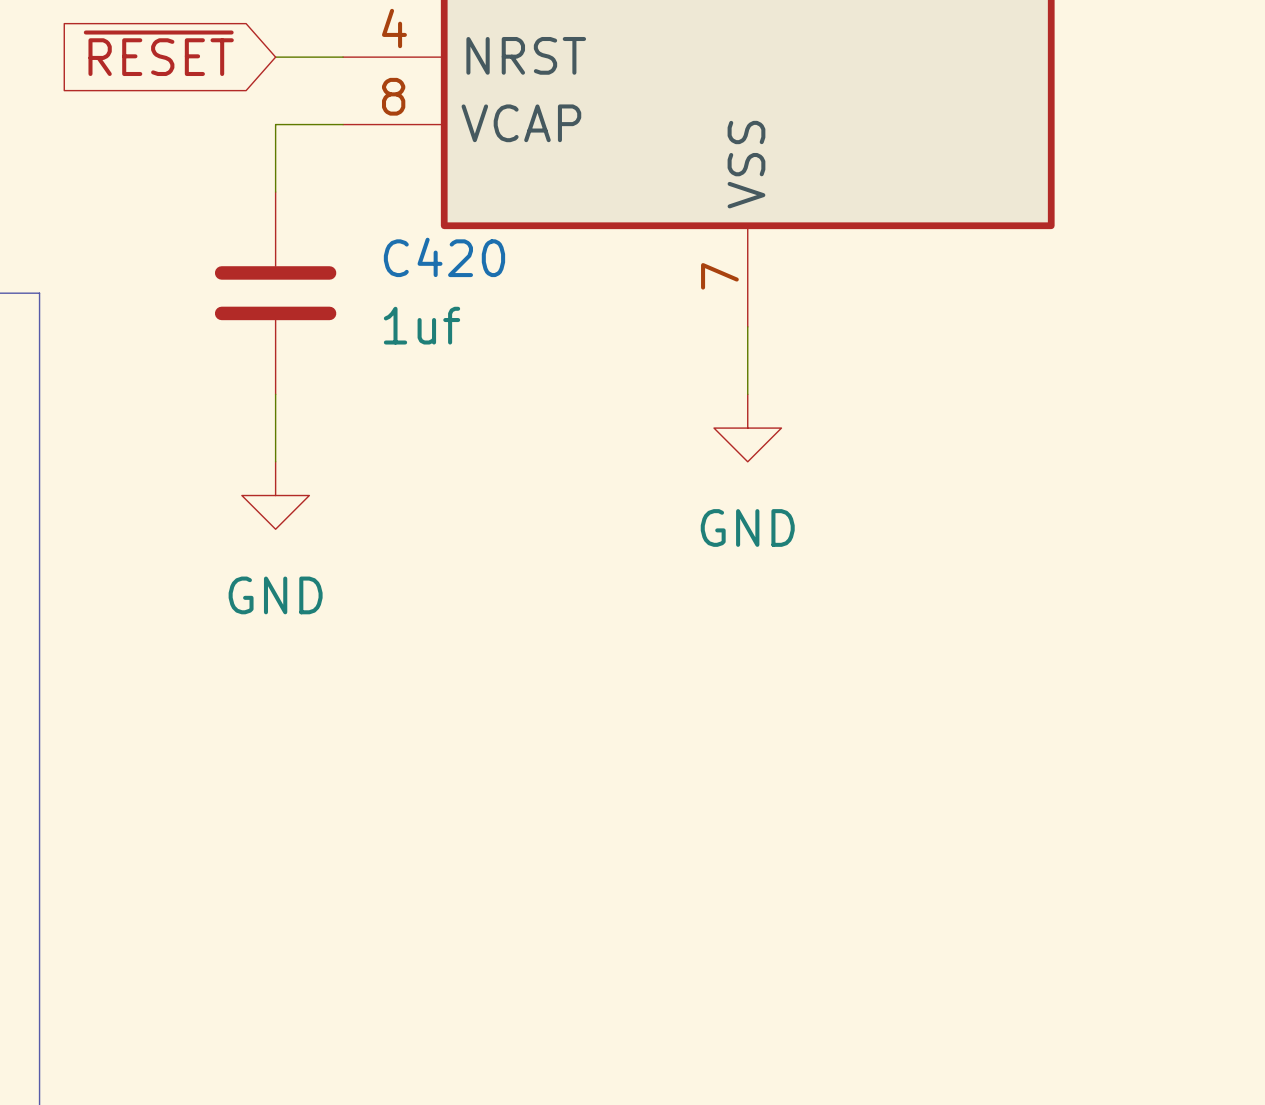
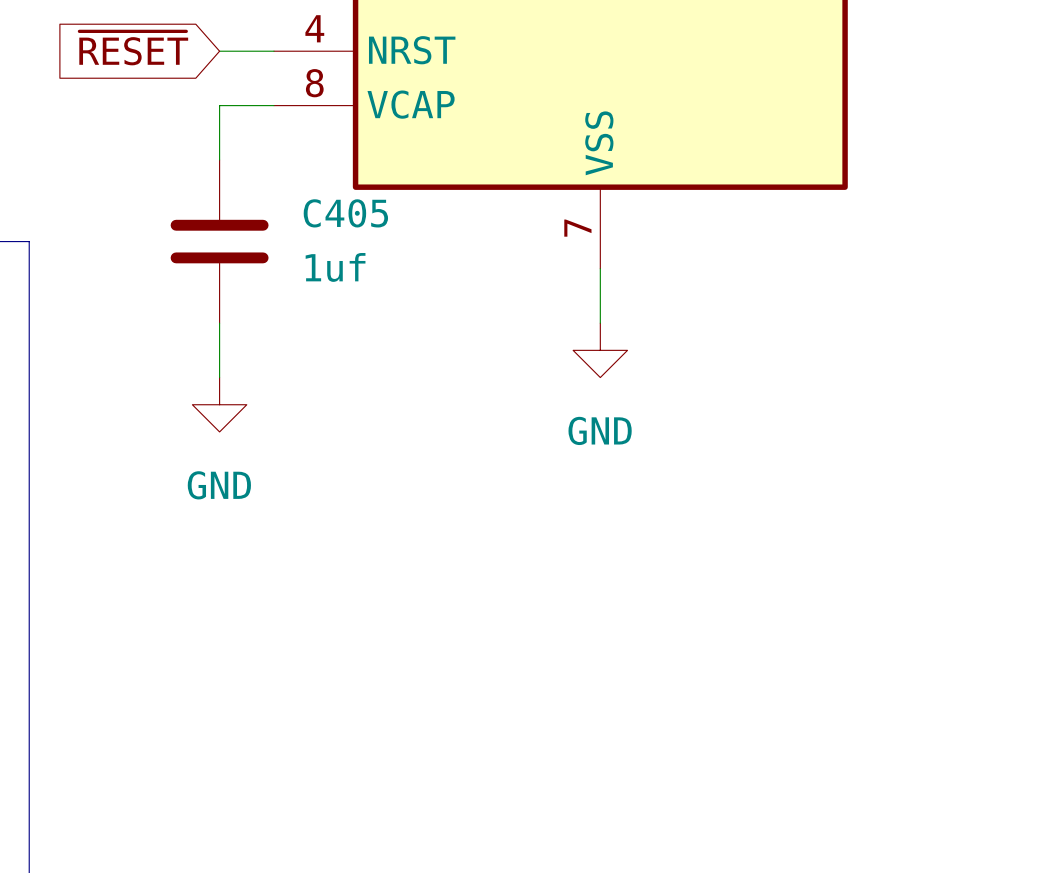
C420 name: C420 (444, 257) -> C405 (345, 213)

